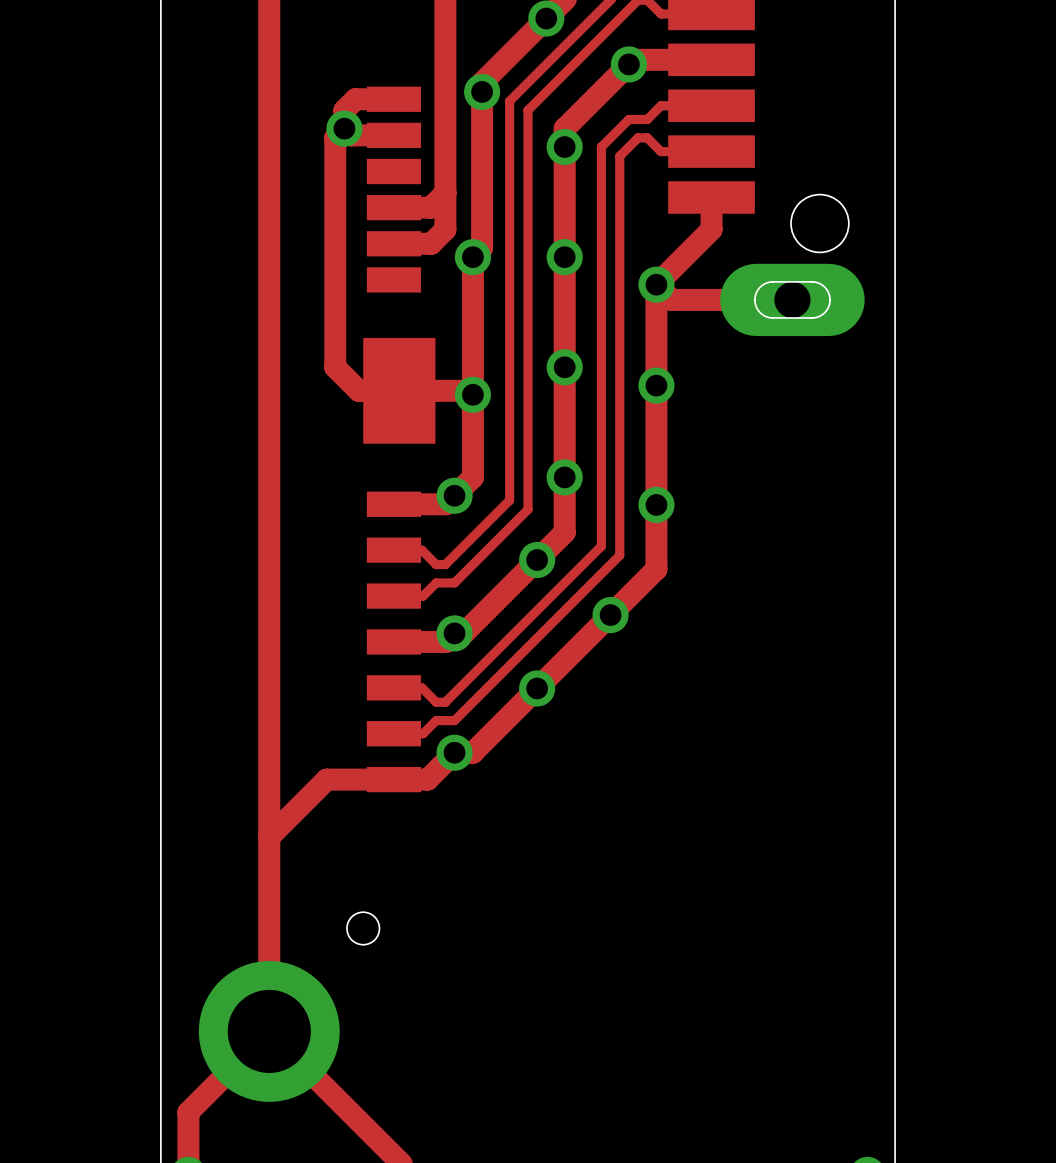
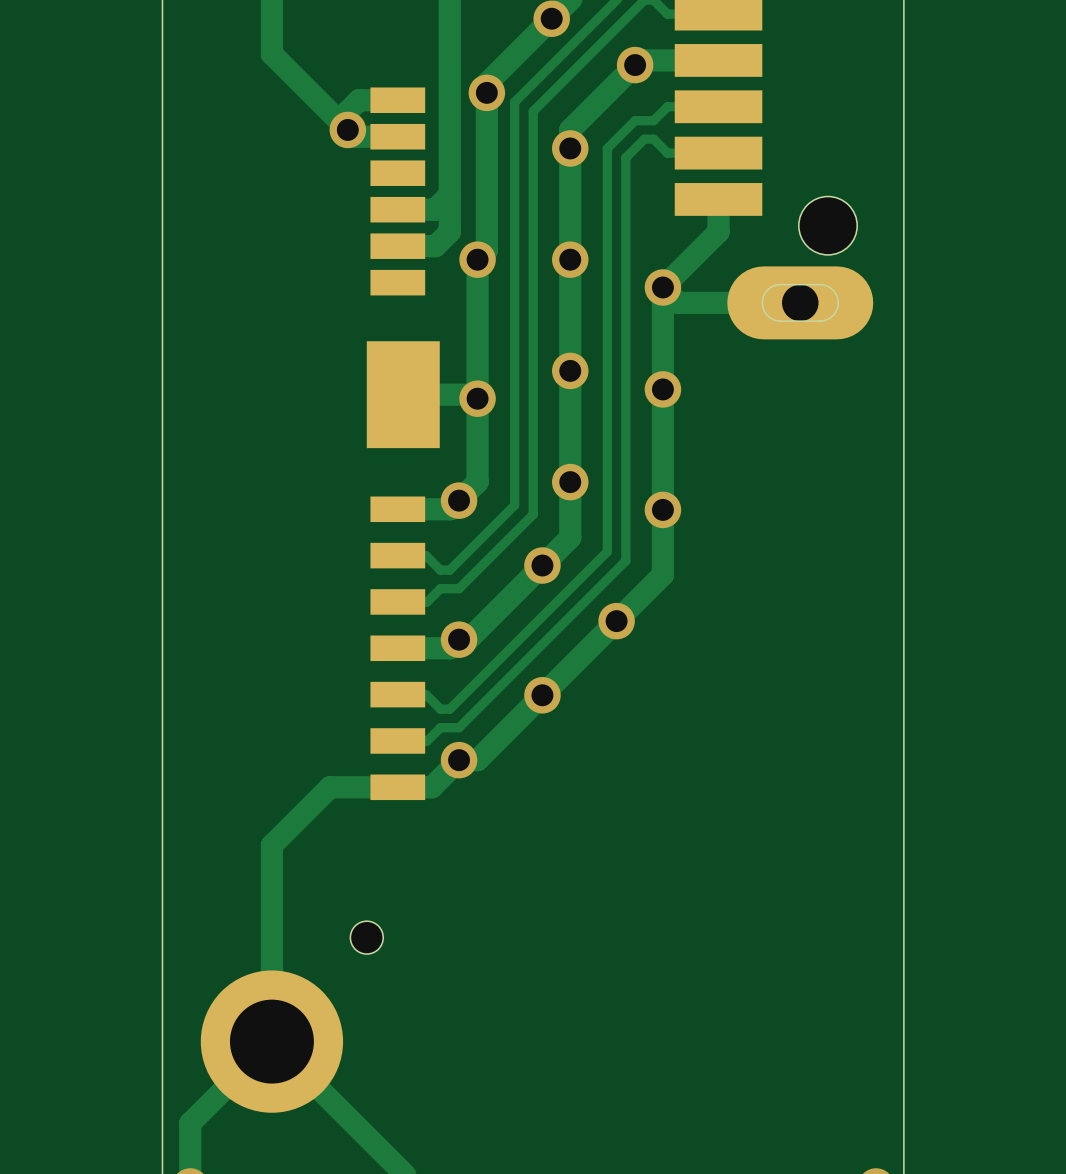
track: (269, 53) (269, 837) -> none
track: (344, 128) (335, 137) (335, 367) (358, 390) (399, 390) -> (347, 129) (271, 54)

